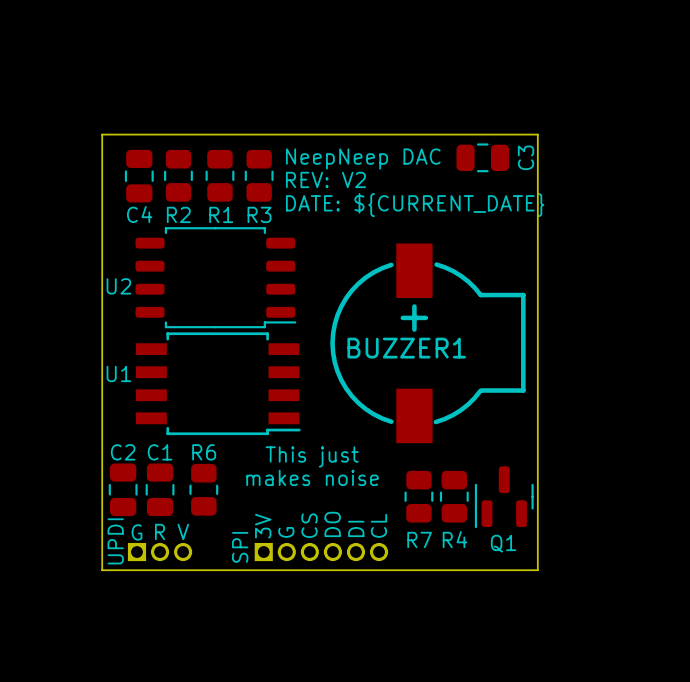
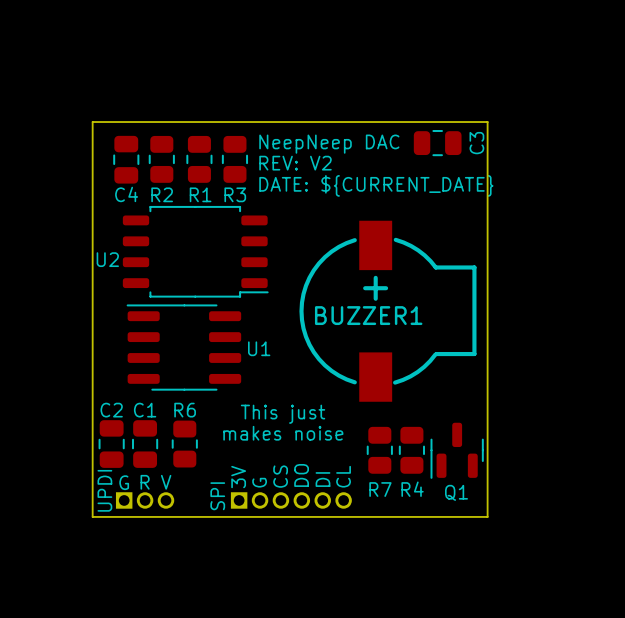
U1 footprint: [135, 332, 301, 436] -> [126, 304, 242, 391]
U1 name position: U1 (118, 373) -> U1 (259, 348)

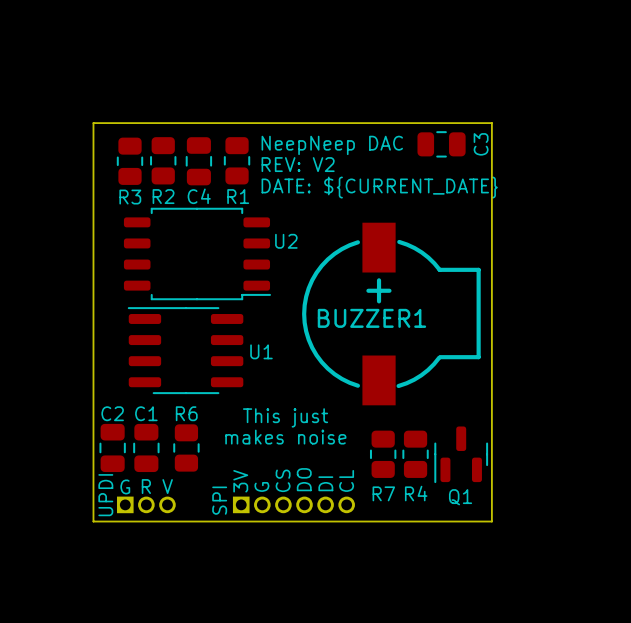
C4 position: (126, 159) -> (198, 161)
R3: none -> (130, 161)
R1: (199, 159) -> none
R3 name: R3 (235, 194) -> R1 (238, 196)
U2 name position: U2 (107, 259) -> U2 (286, 241)

